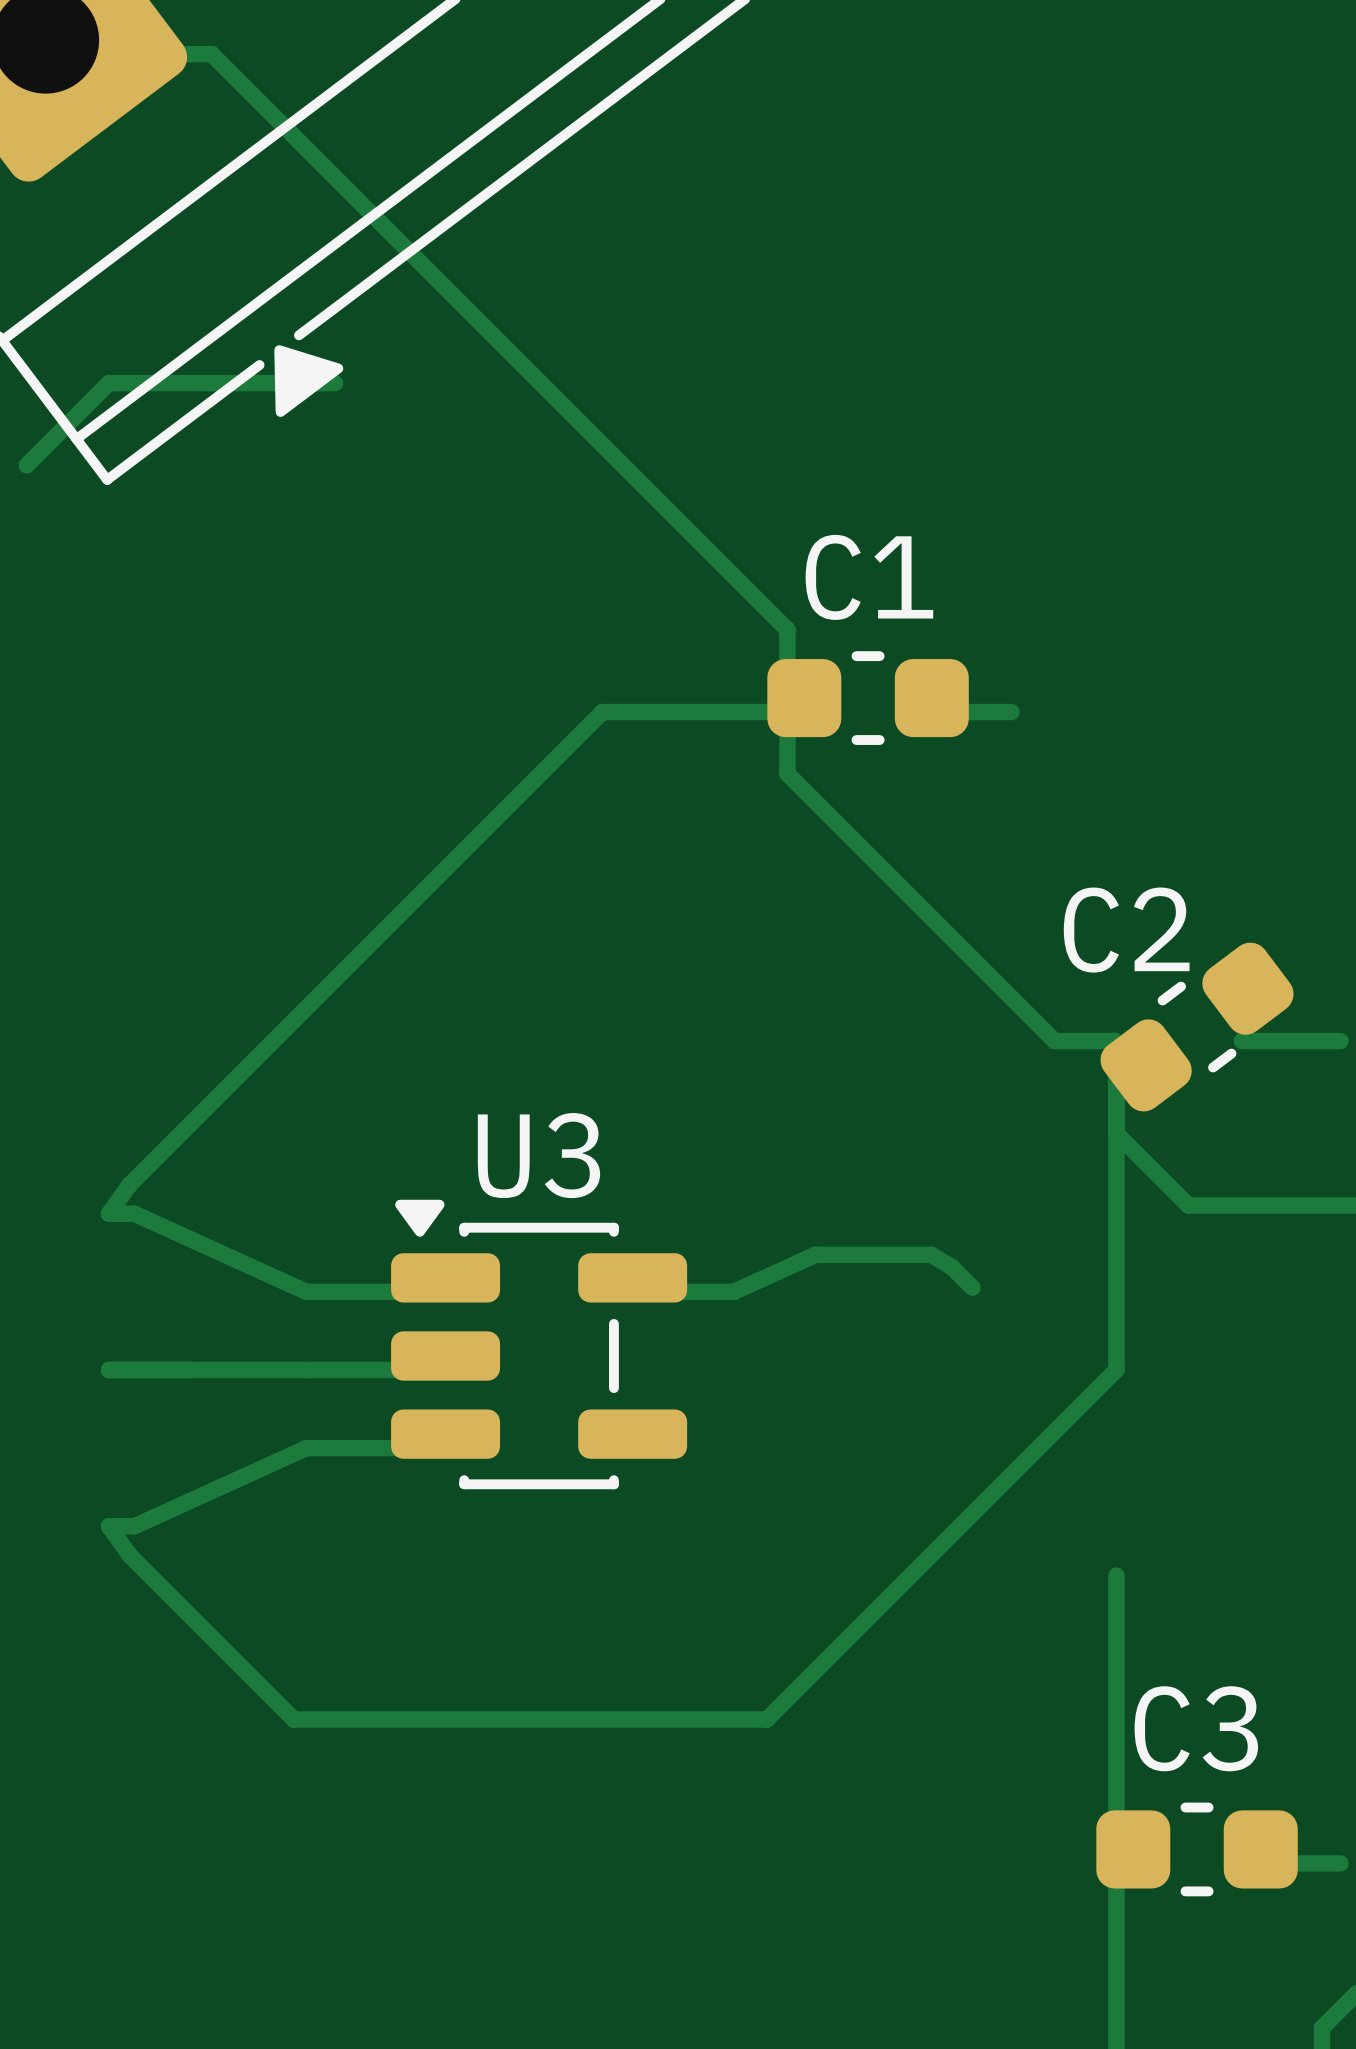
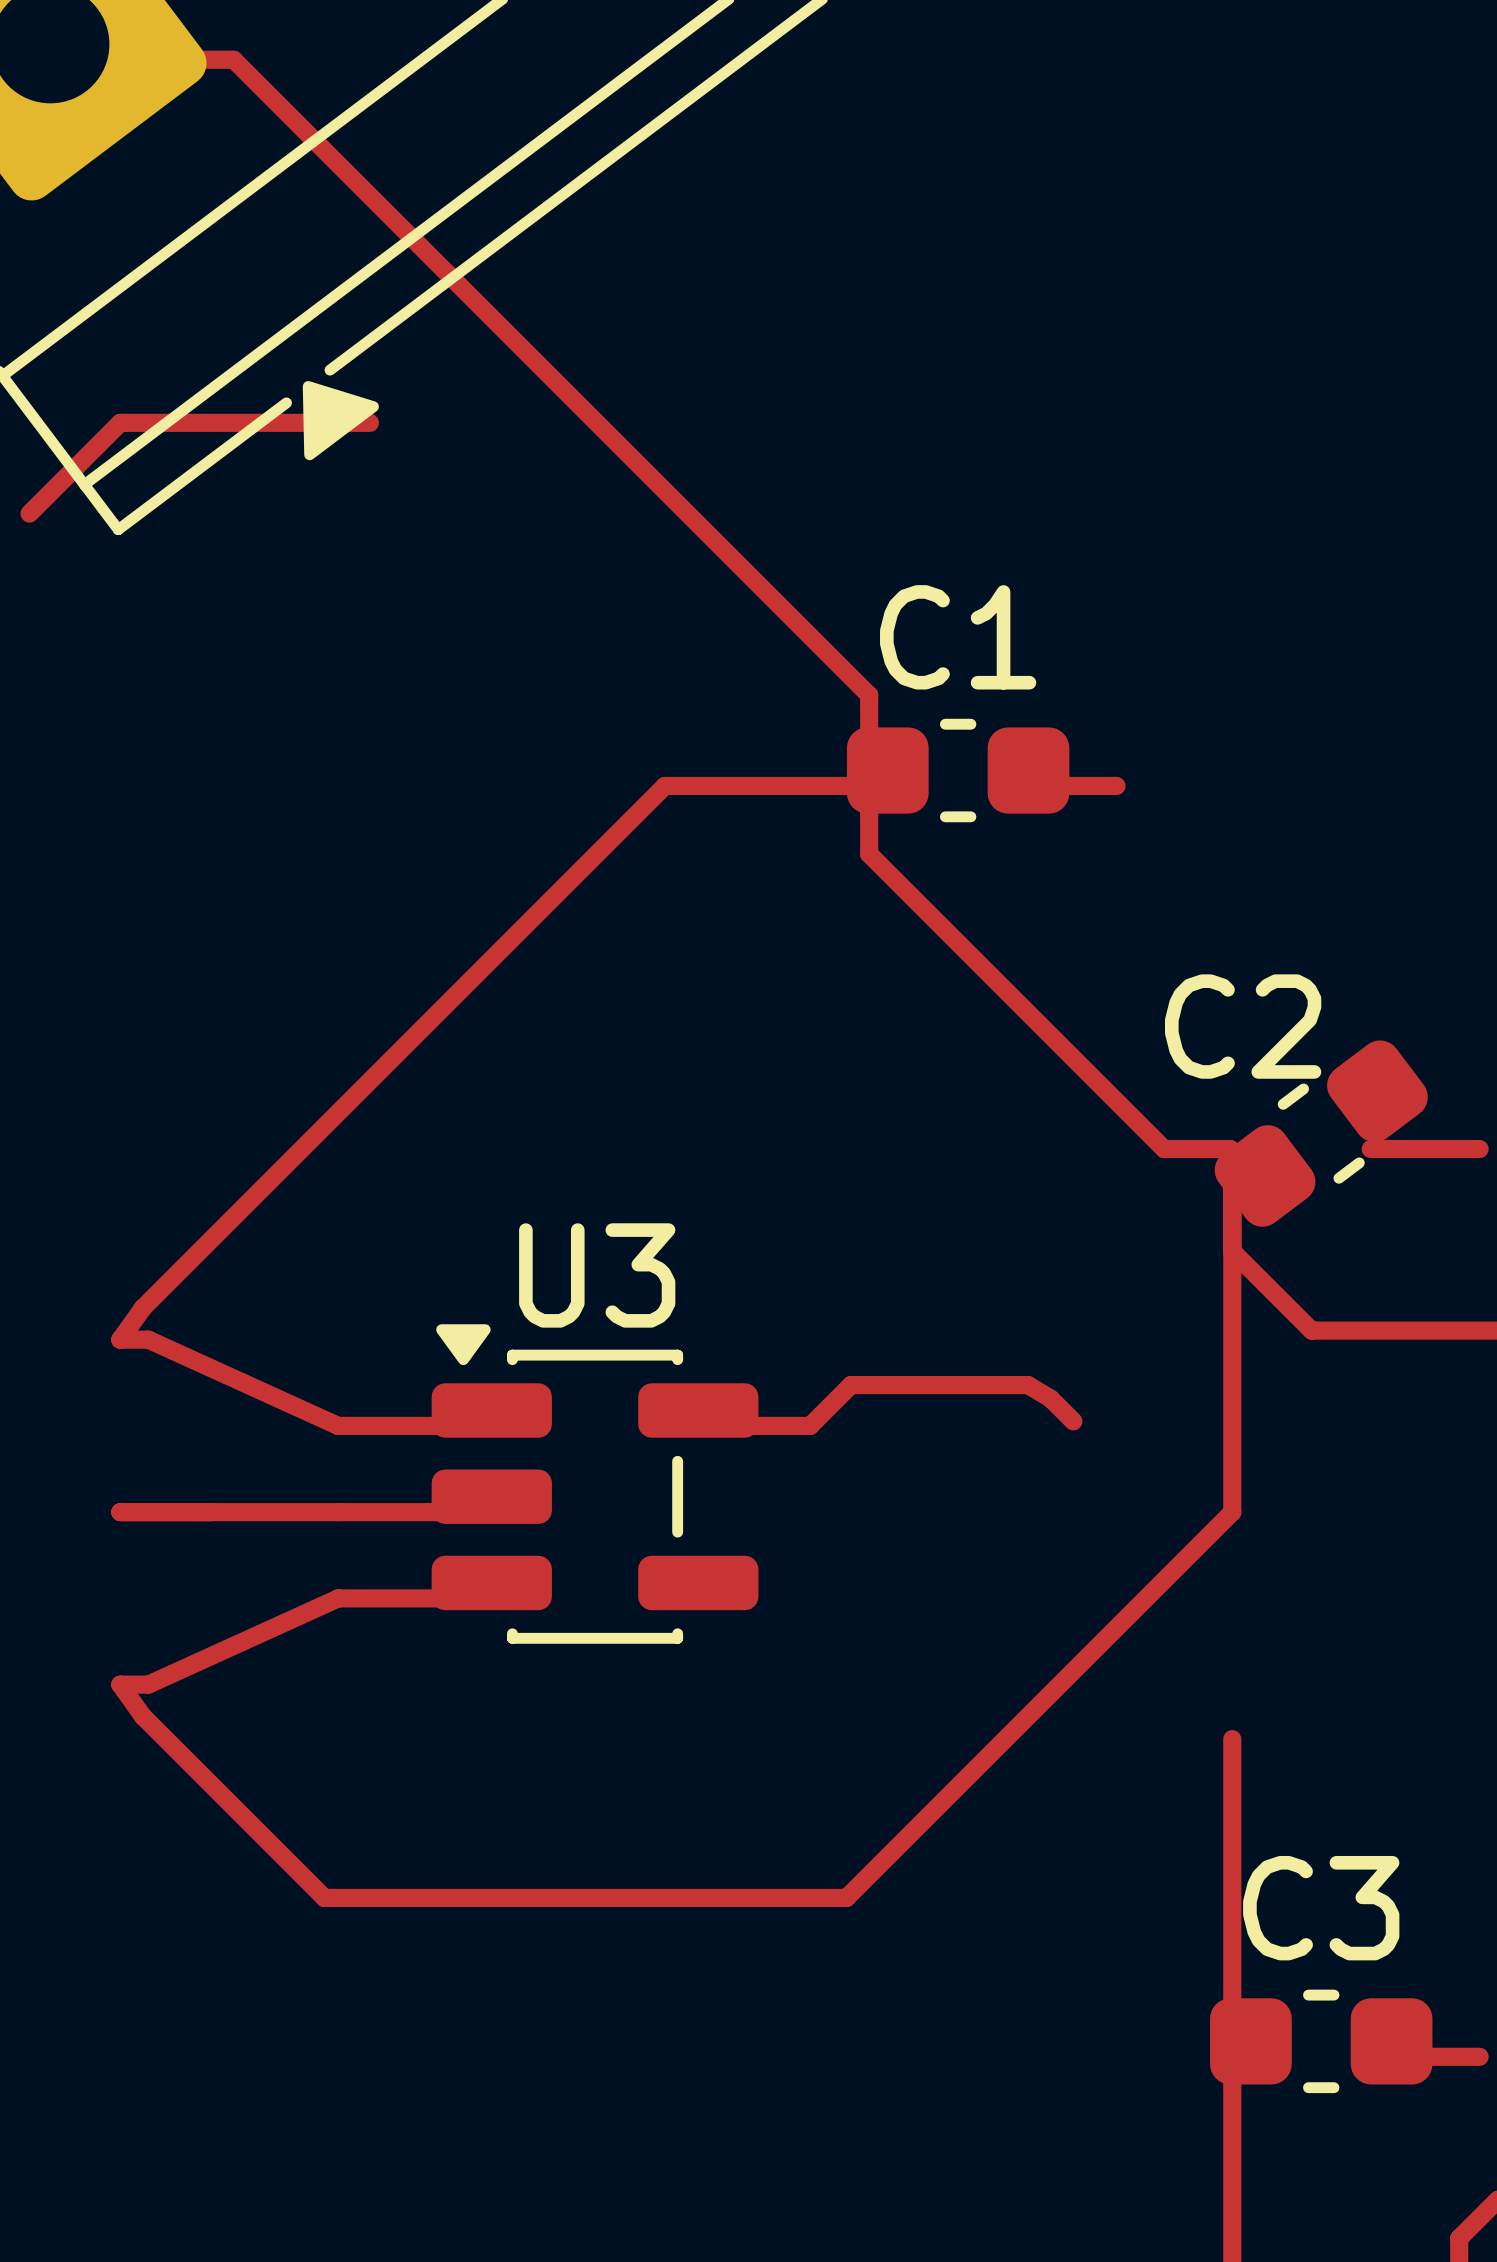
track: (815, 1254) (734, 1291) -> (900, 1385) (851, 1385) (810, 1425)

